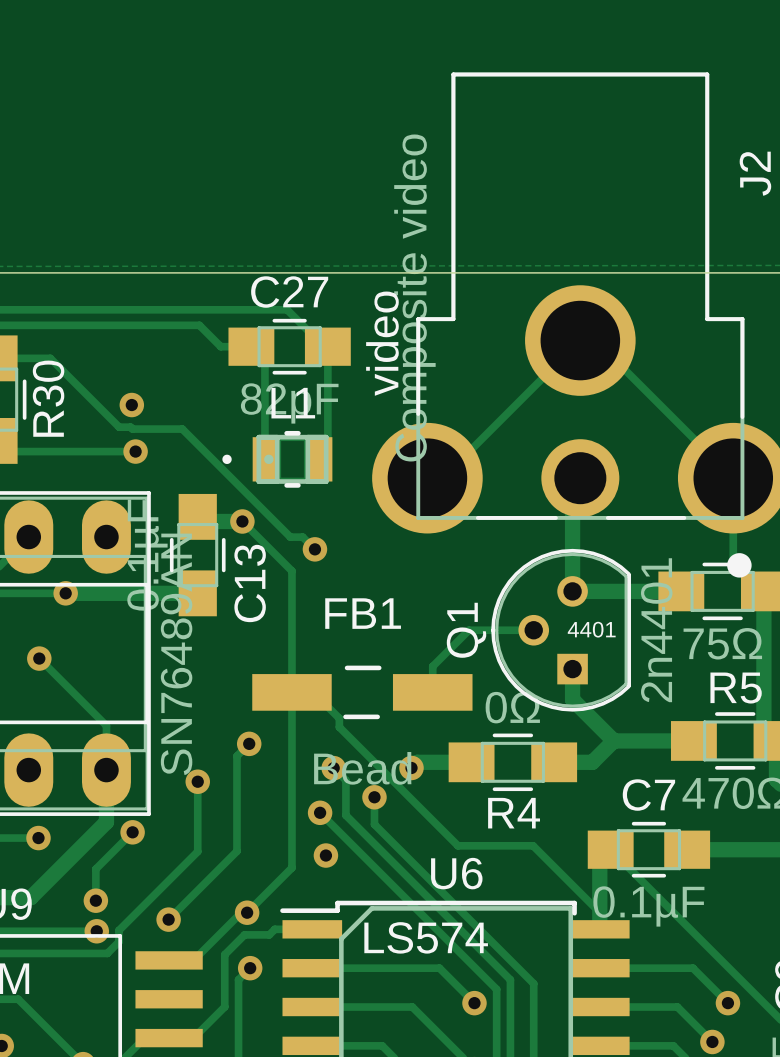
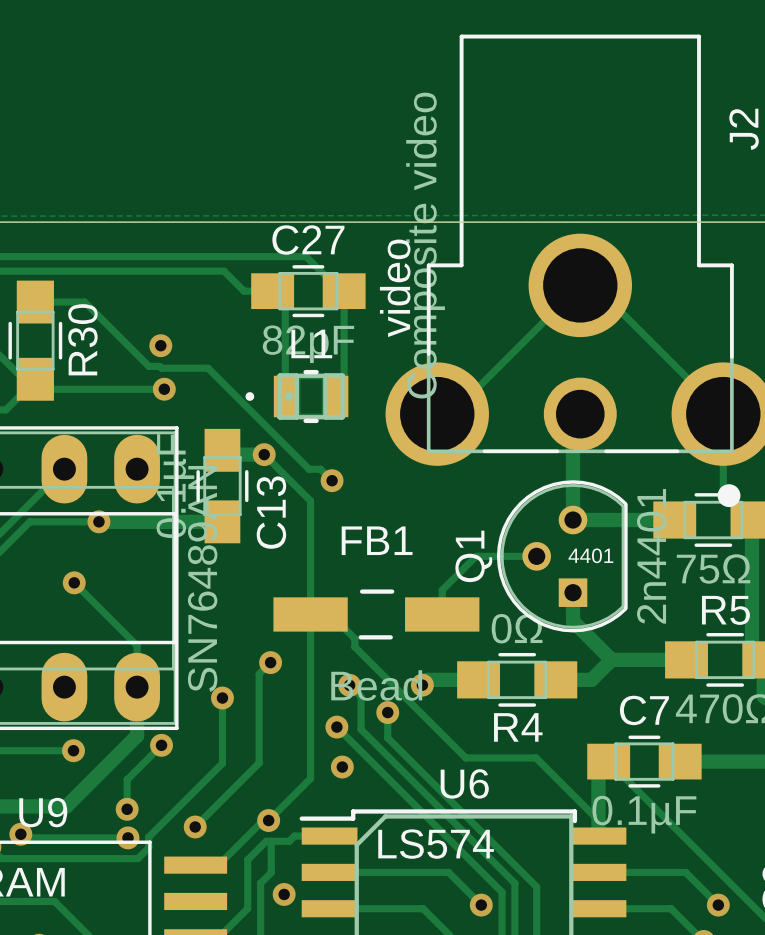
track: none -> (271, 841) (271, 872)
via position: (250, 968) -> (284, 894)

